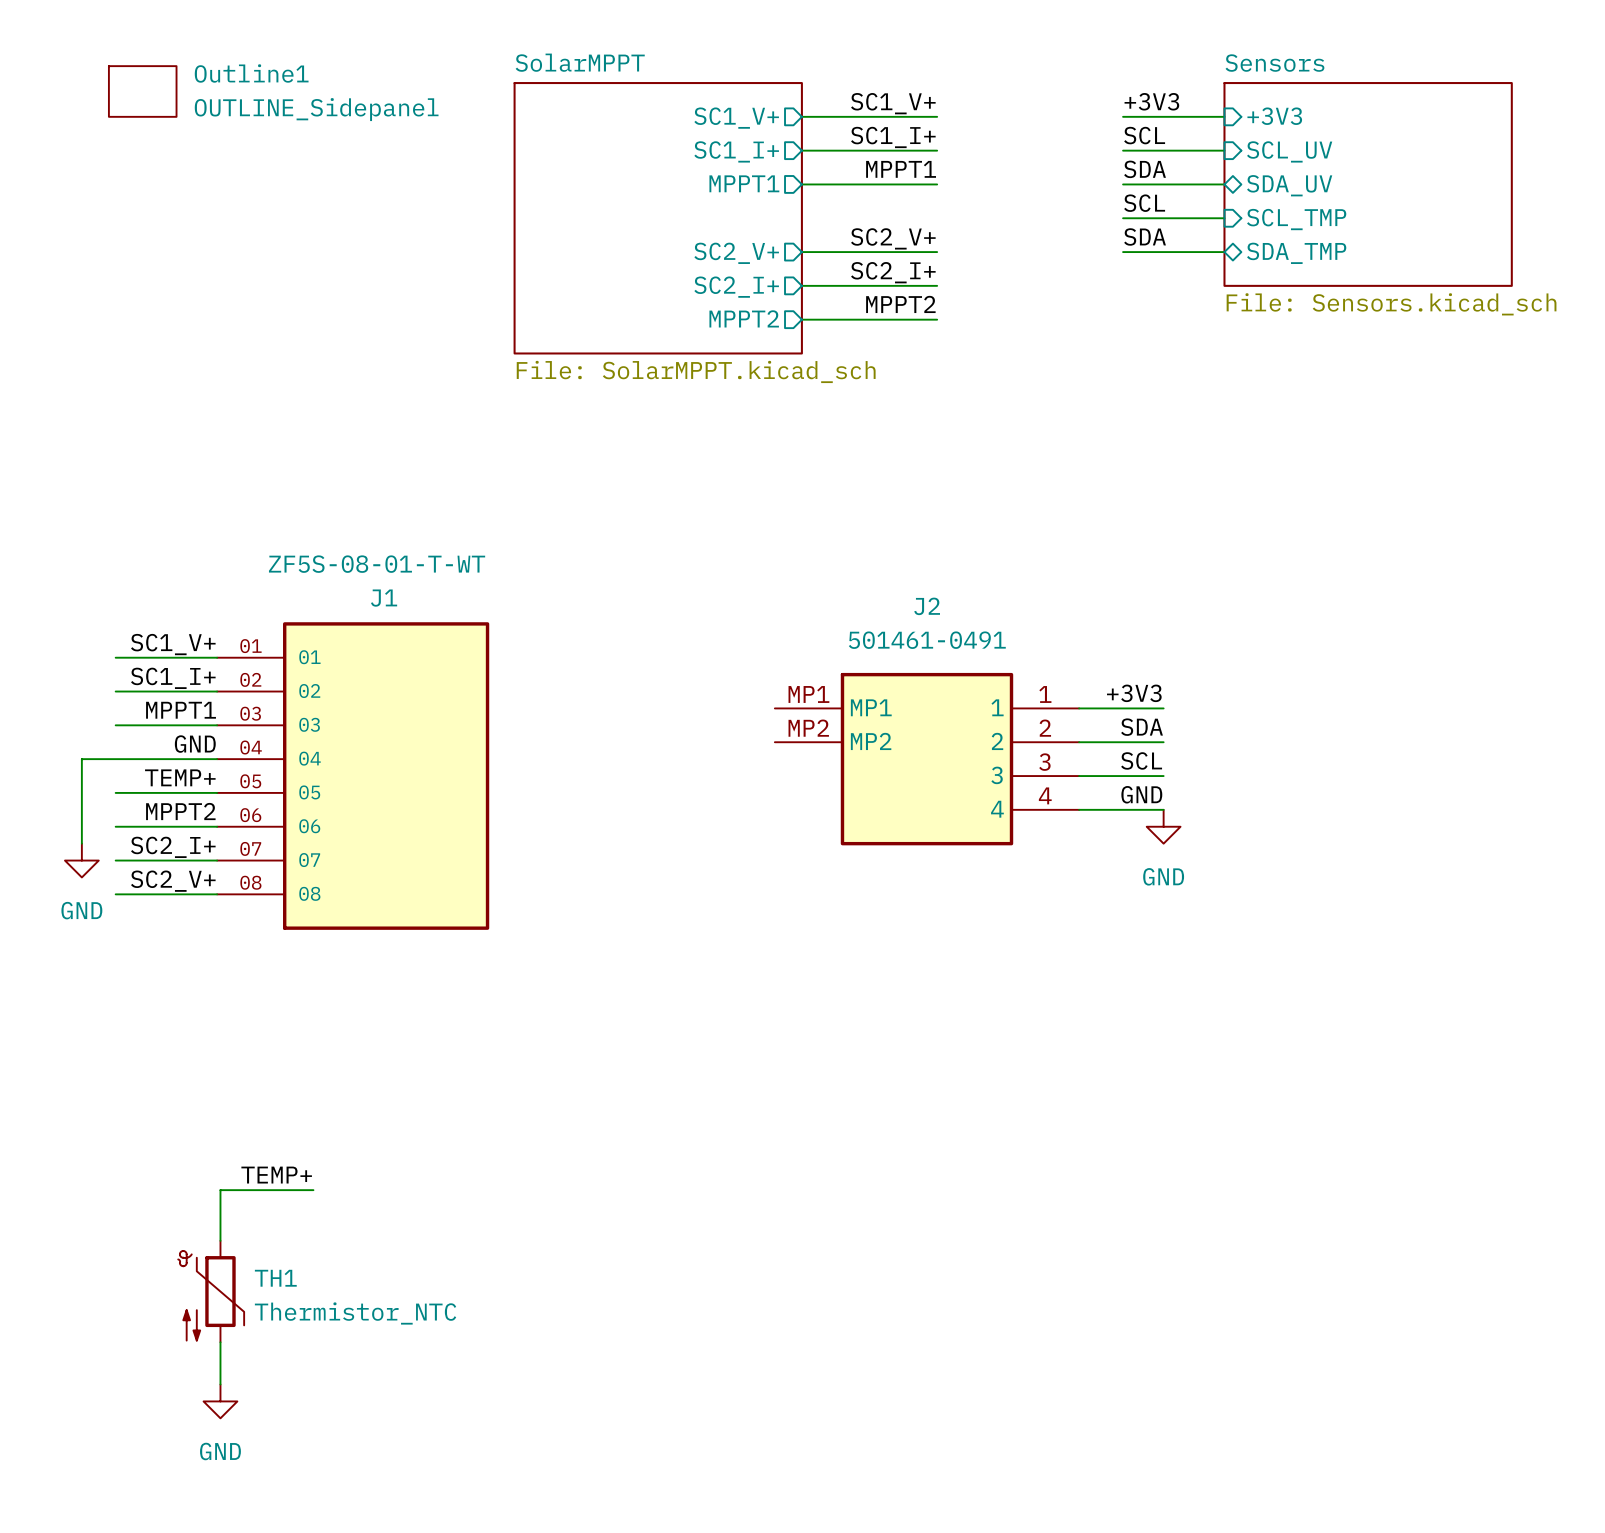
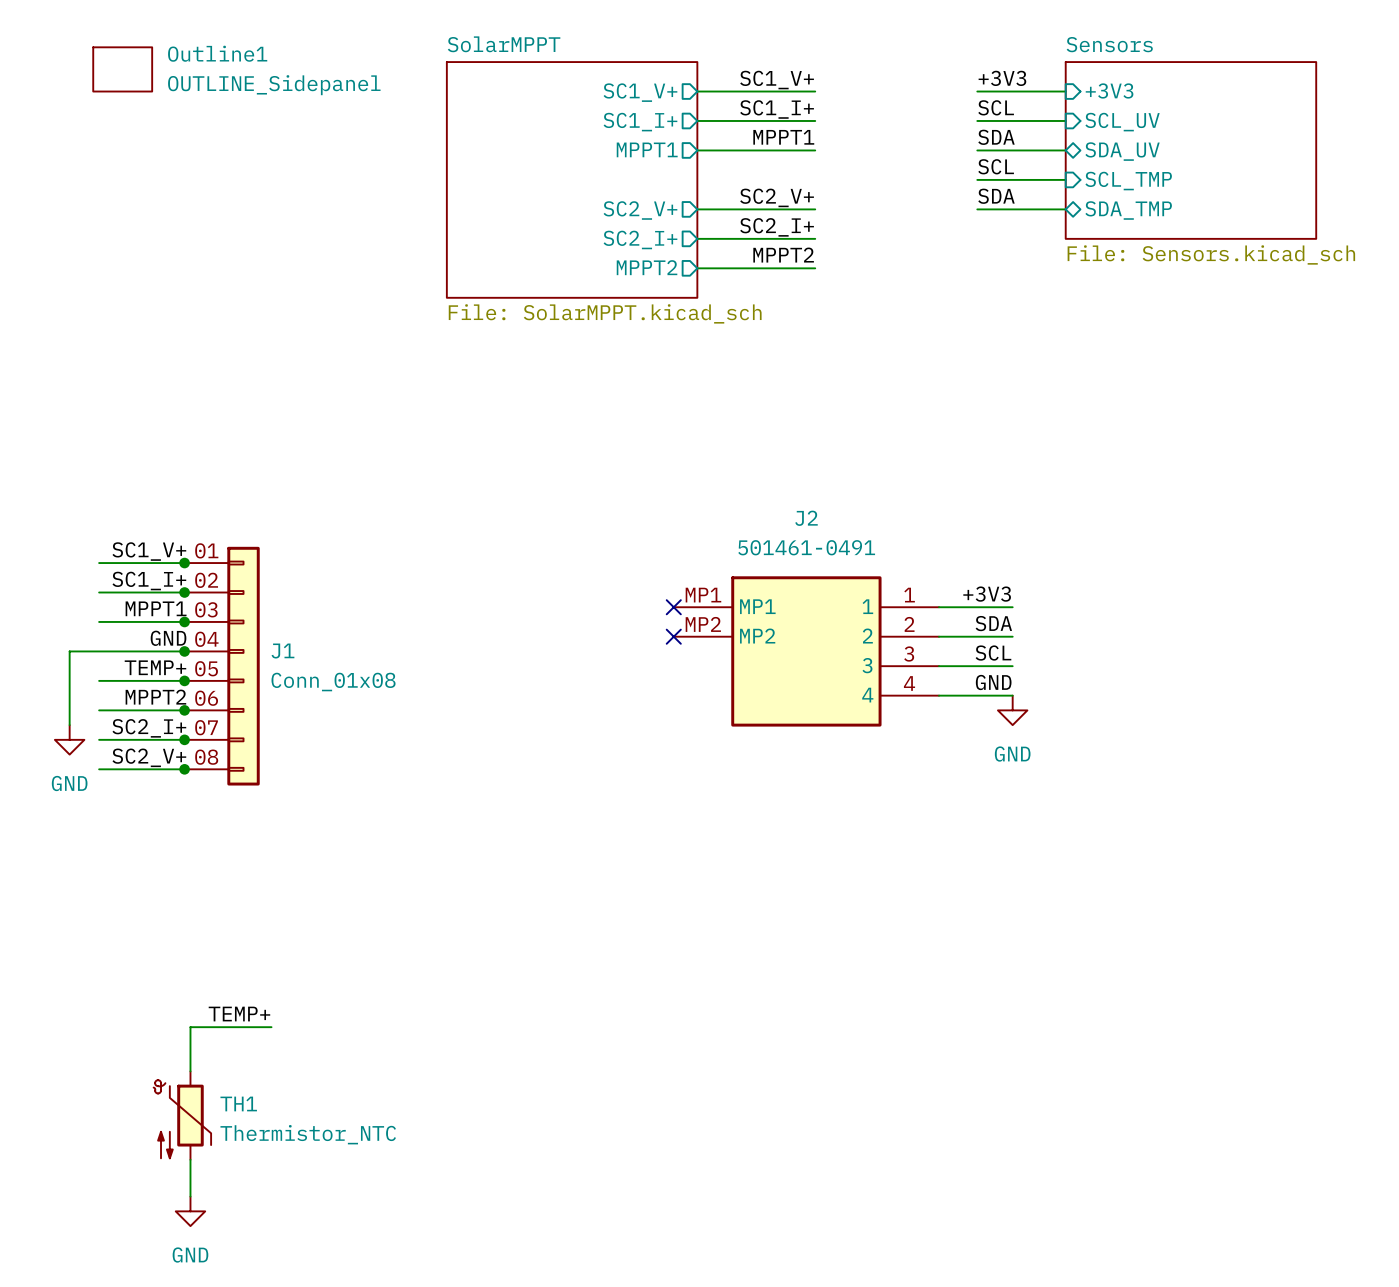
J1 value: ZF5S-08-01-T-WT (377, 564) -> Conn_01x08 (333, 682)
J1 name position: J1 (384, 598) -> J1 (282, 651)
J1 symbol: [217, 622, 490, 930] -> [184, 546, 260, 786]
junction: none -> (184, 563)
junction: none -> (184, 592)
no-connect mark: none -> (673, 607)
junction: none -> (184, 621)
no-connect mark: none -> (673, 636)
junction: none -> (184, 651)
junction: none -> (184, 680)
junction: none -> (184, 710)
junction: none -> (184, 739)
junction: none -> (184, 769)
TH1 symbol: [178, 1240, 245, 1343] -> [153, 1071, 212, 1160]

